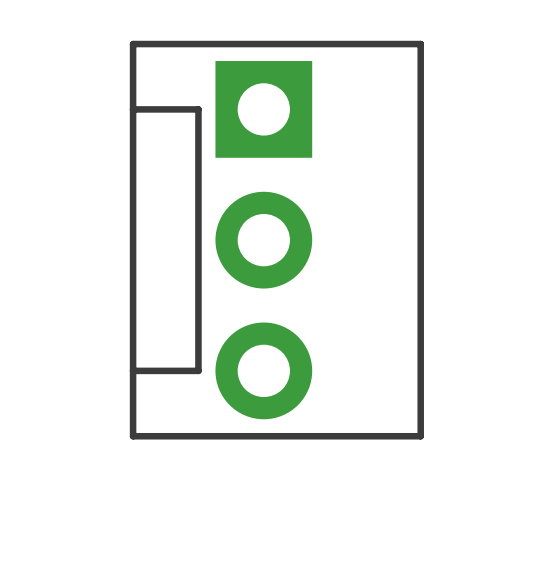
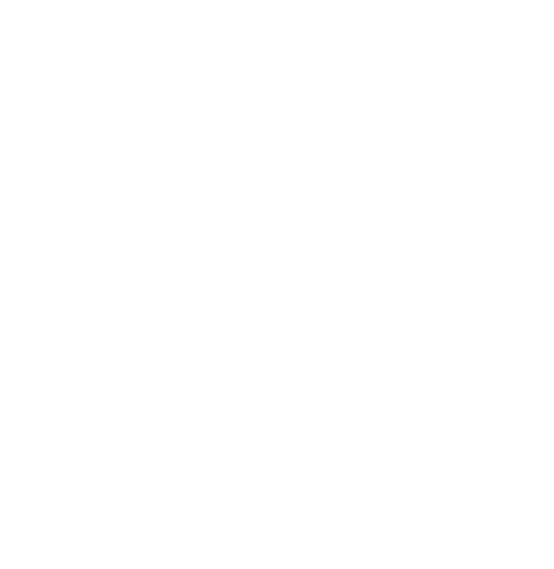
part: (276, 240) -> none

